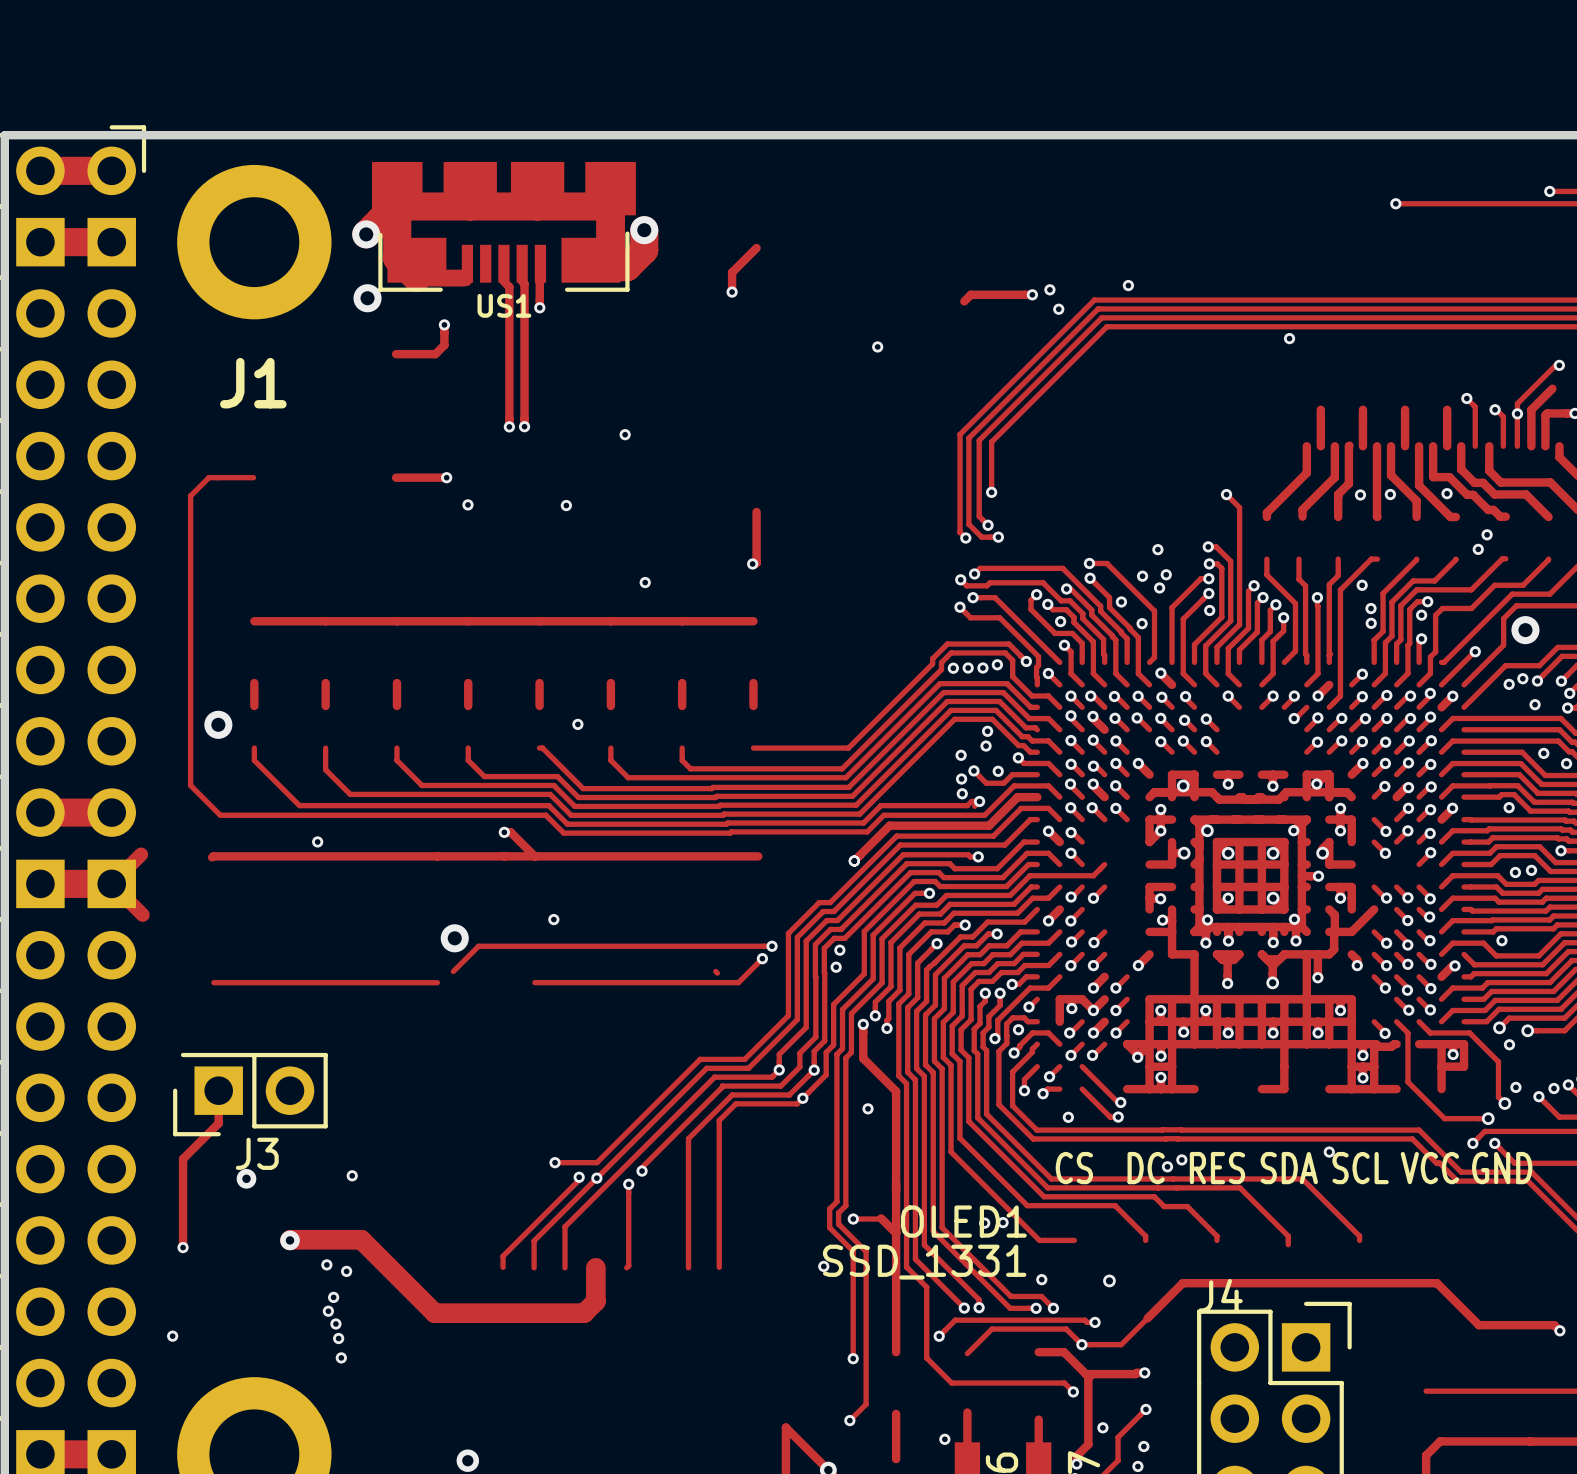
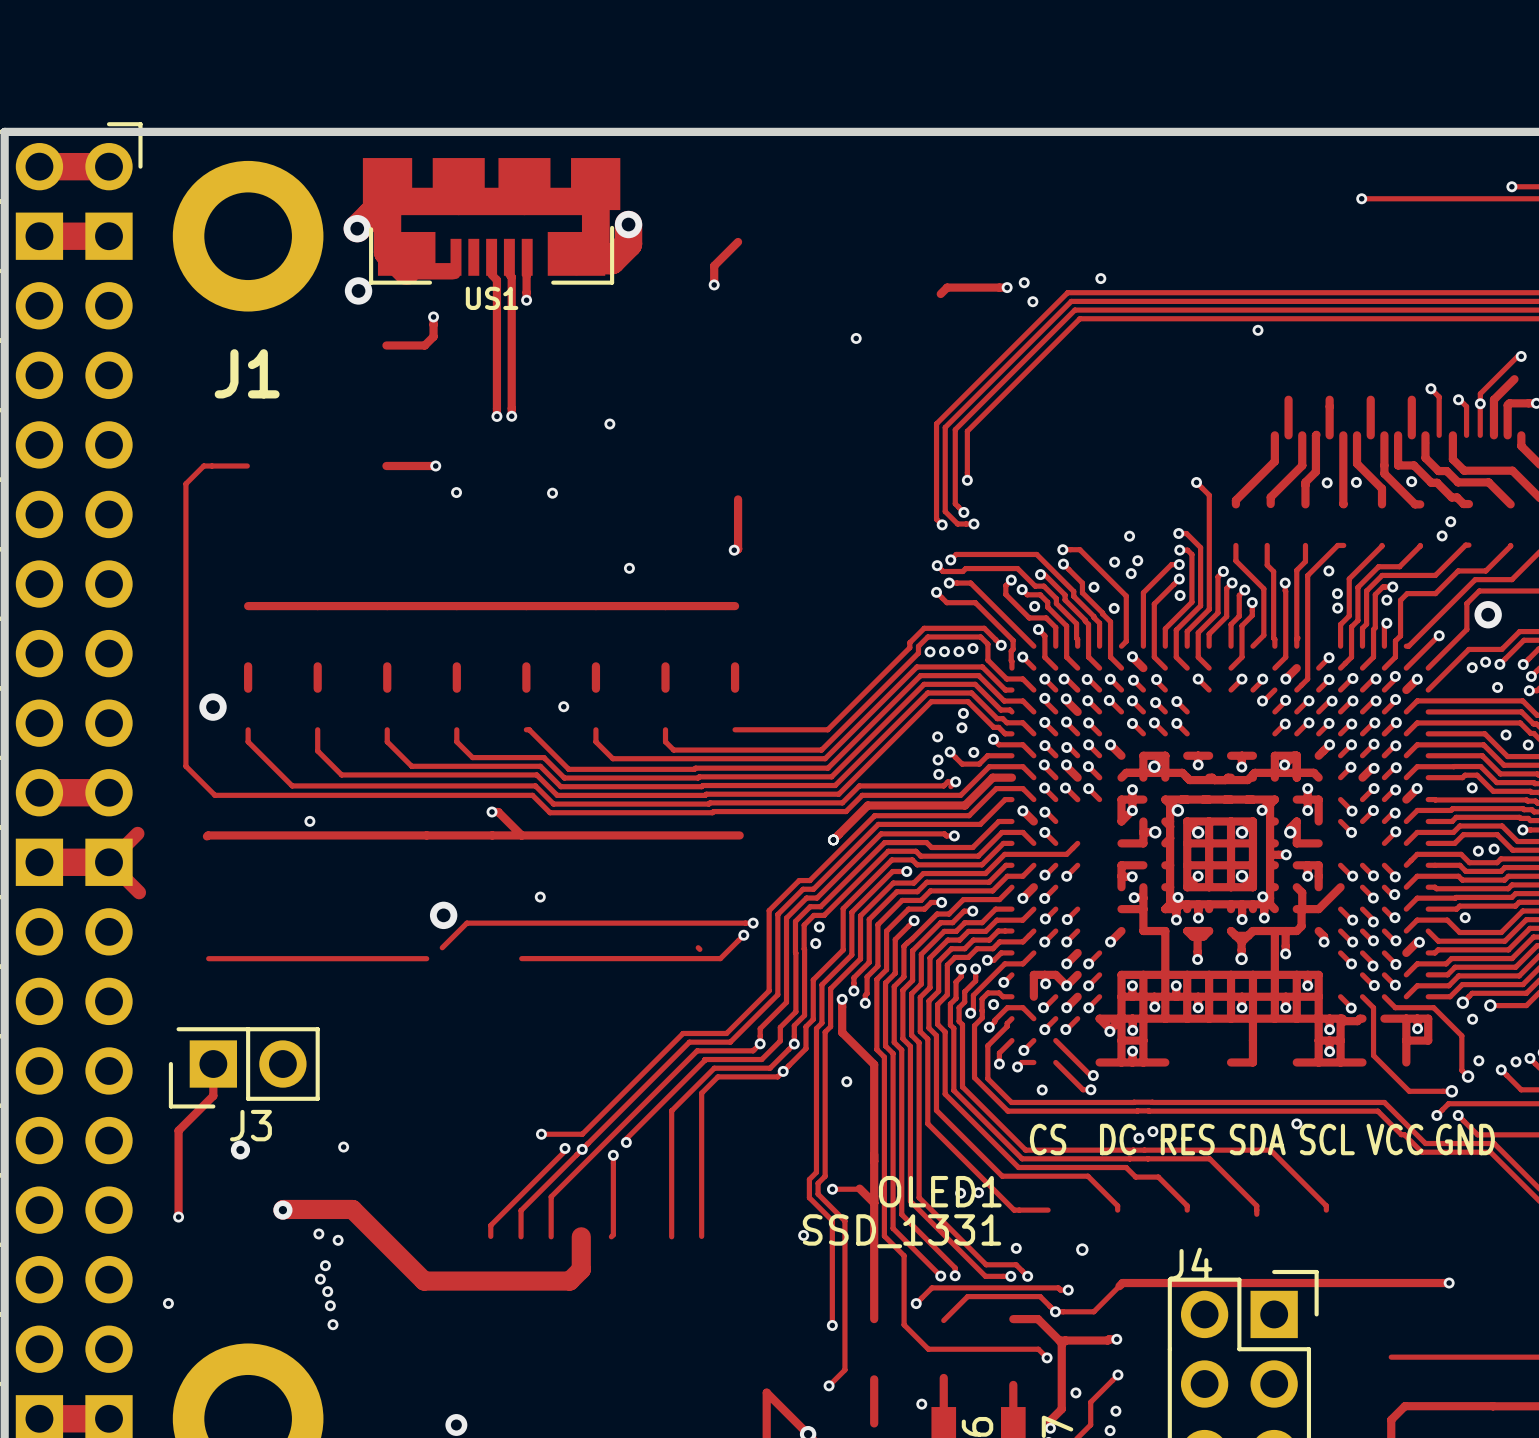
track: (1150, 1315) (1182, 1283) (1437, 1283) (1478, 1325) (1554, 1325) (1559, 1330) -> (1122, 1283) (1449, 1283)
via position: (1559, 1330) -> (1449, 1283)

